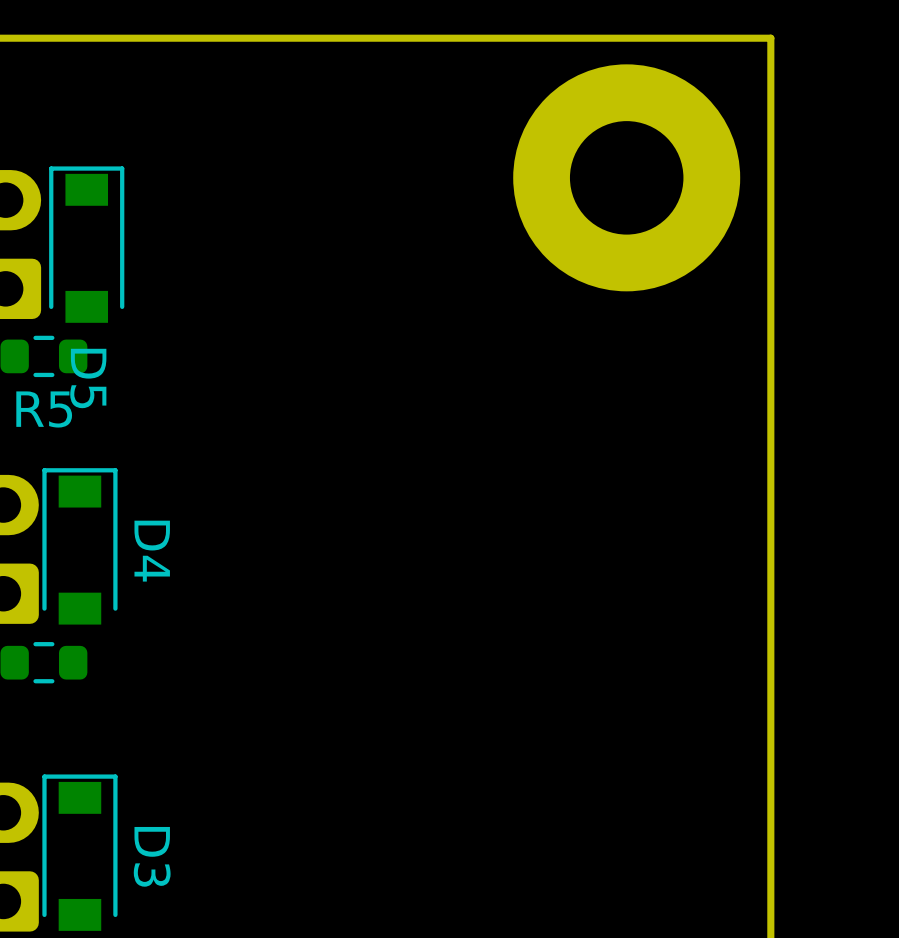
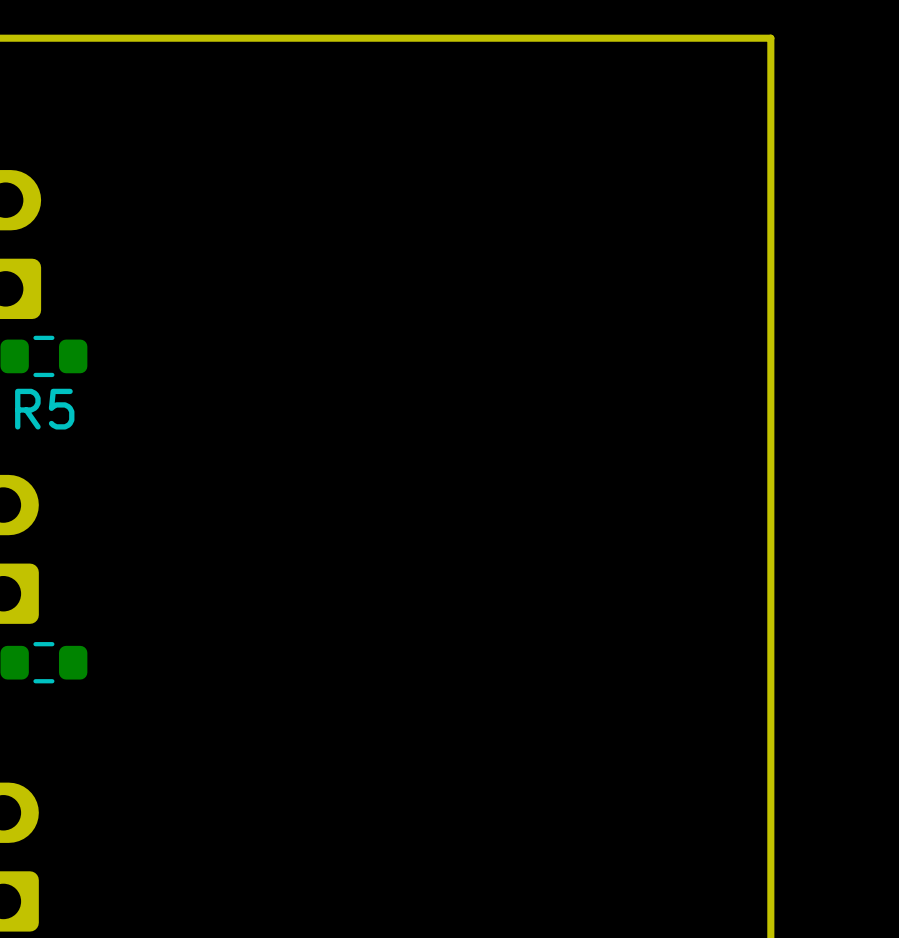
part: (626, 177) -> none
D5: (86, 244) -> none
D4: (79, 546) -> none
D3: (79, 852) -> none

